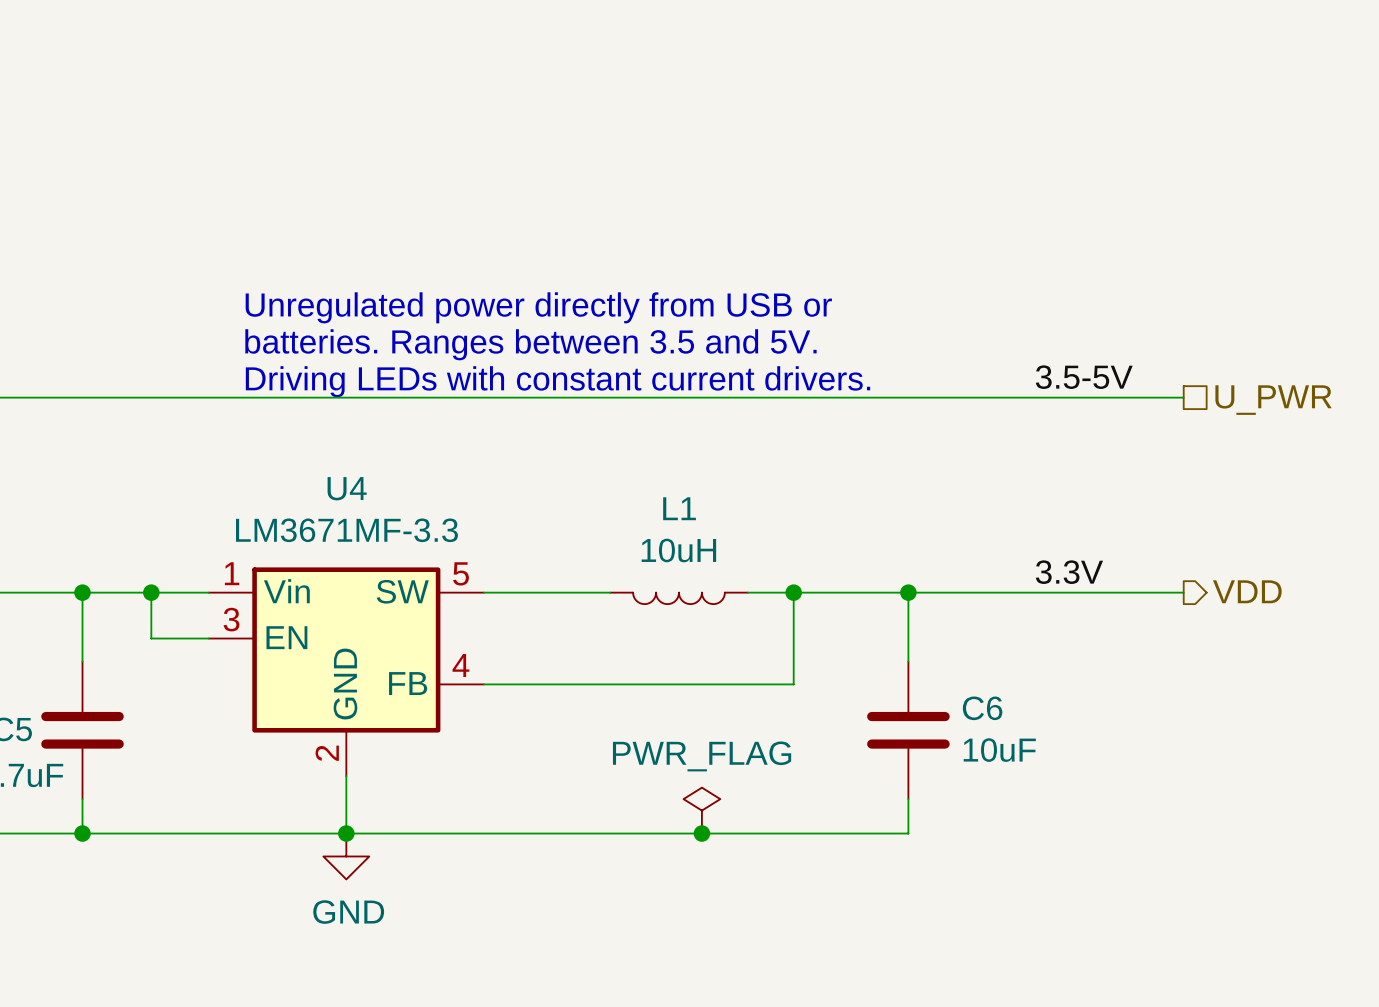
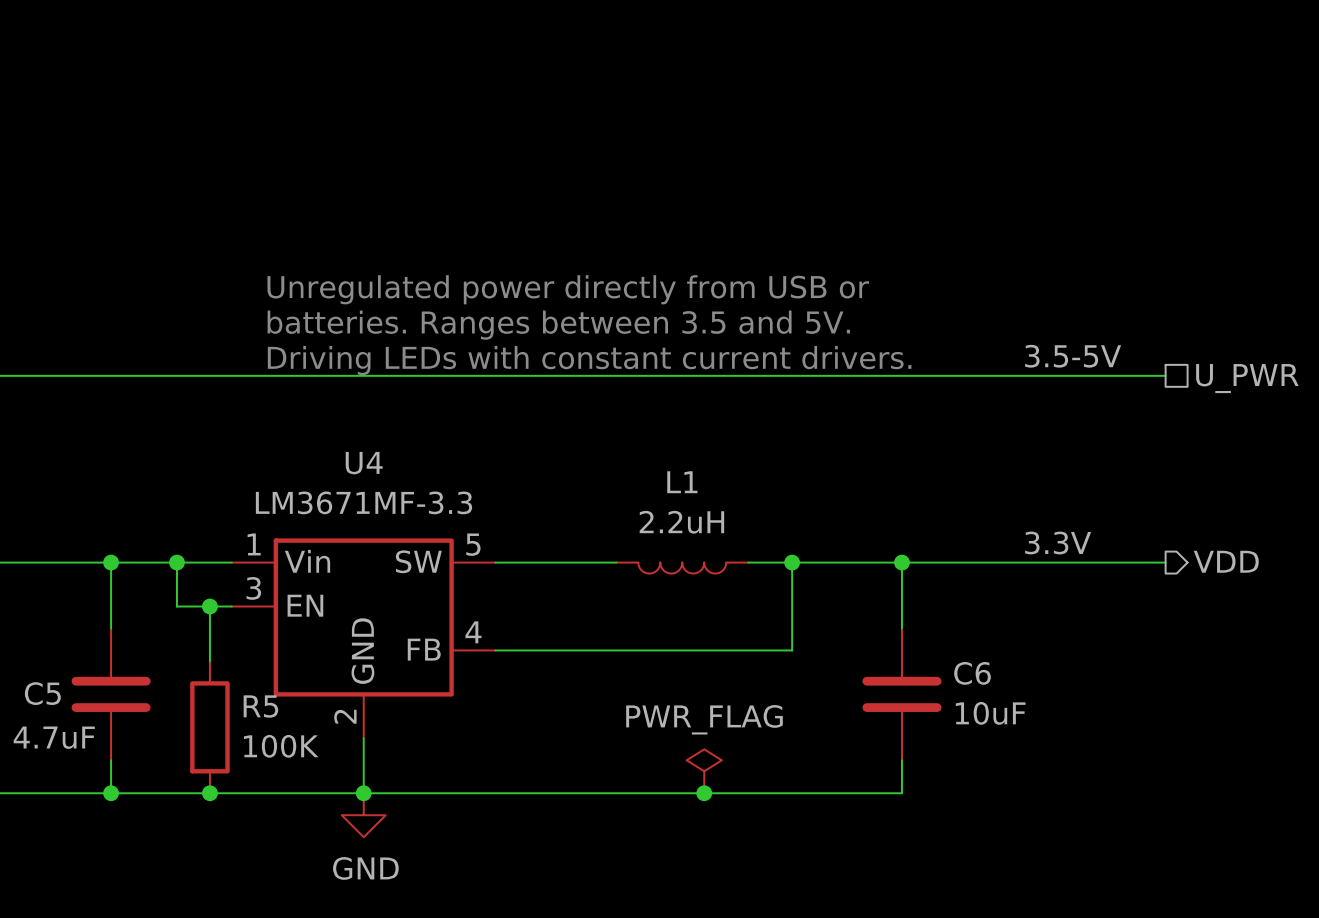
L1 value: 10uH (678, 550) -> 2.2uH (681, 522)
wire: none -> (209, 606) (209, 661)
junction: none -> (209, 606)
R5: none -> 100K (209, 727)
junction: none -> (209, 793)

